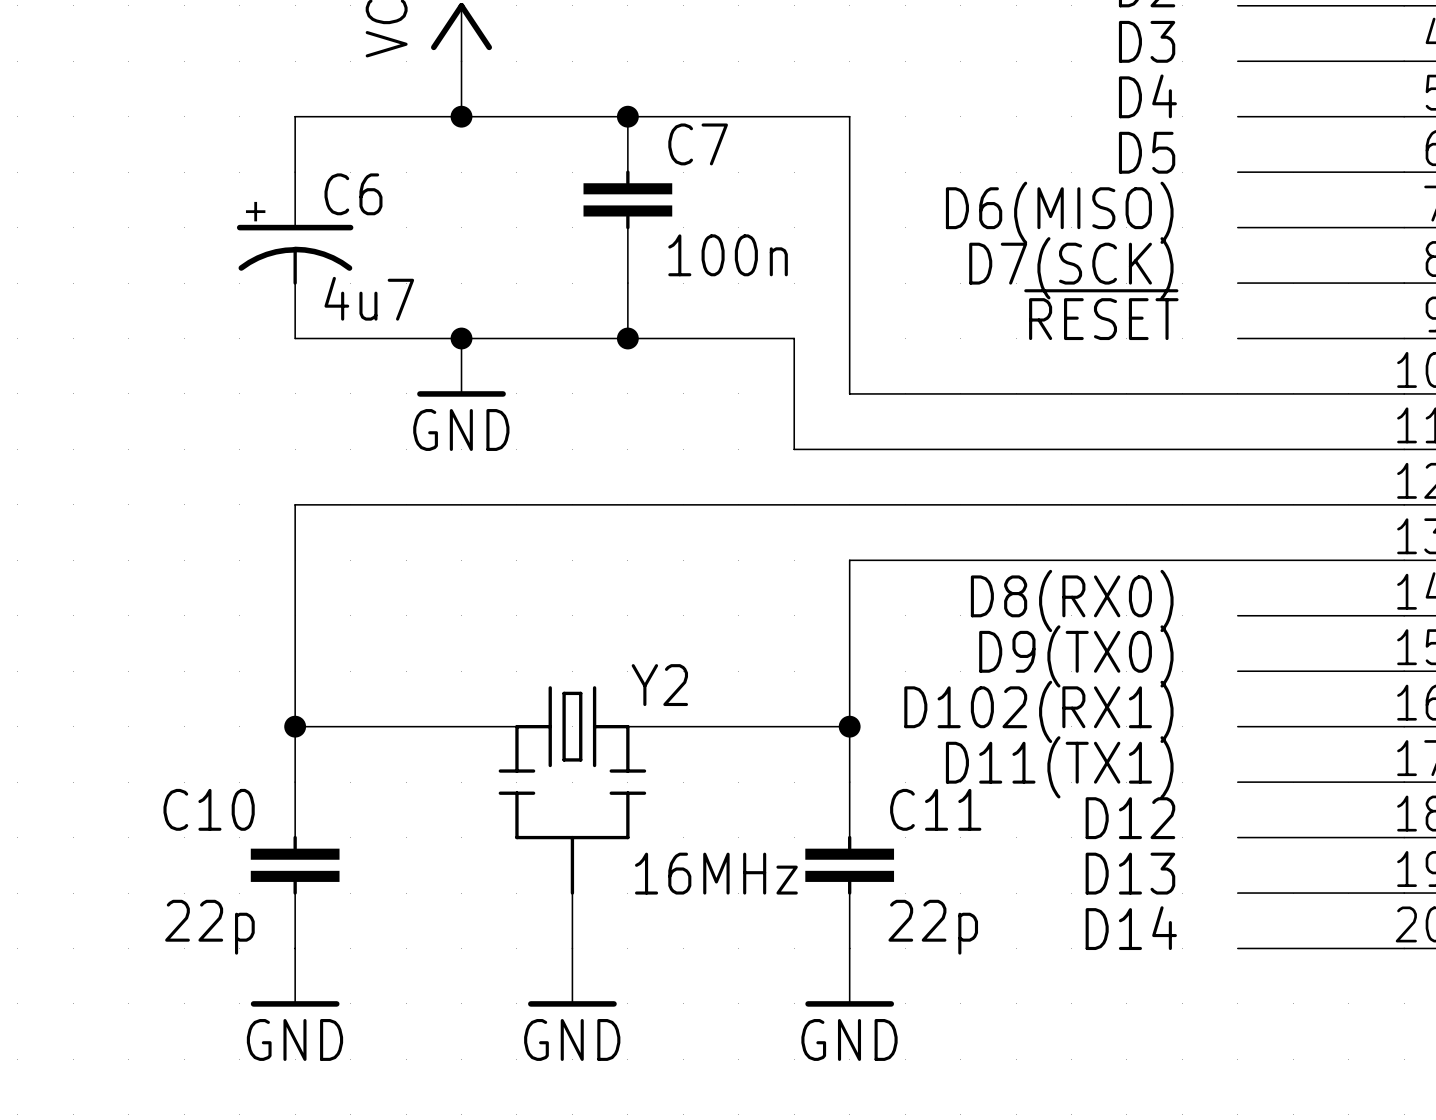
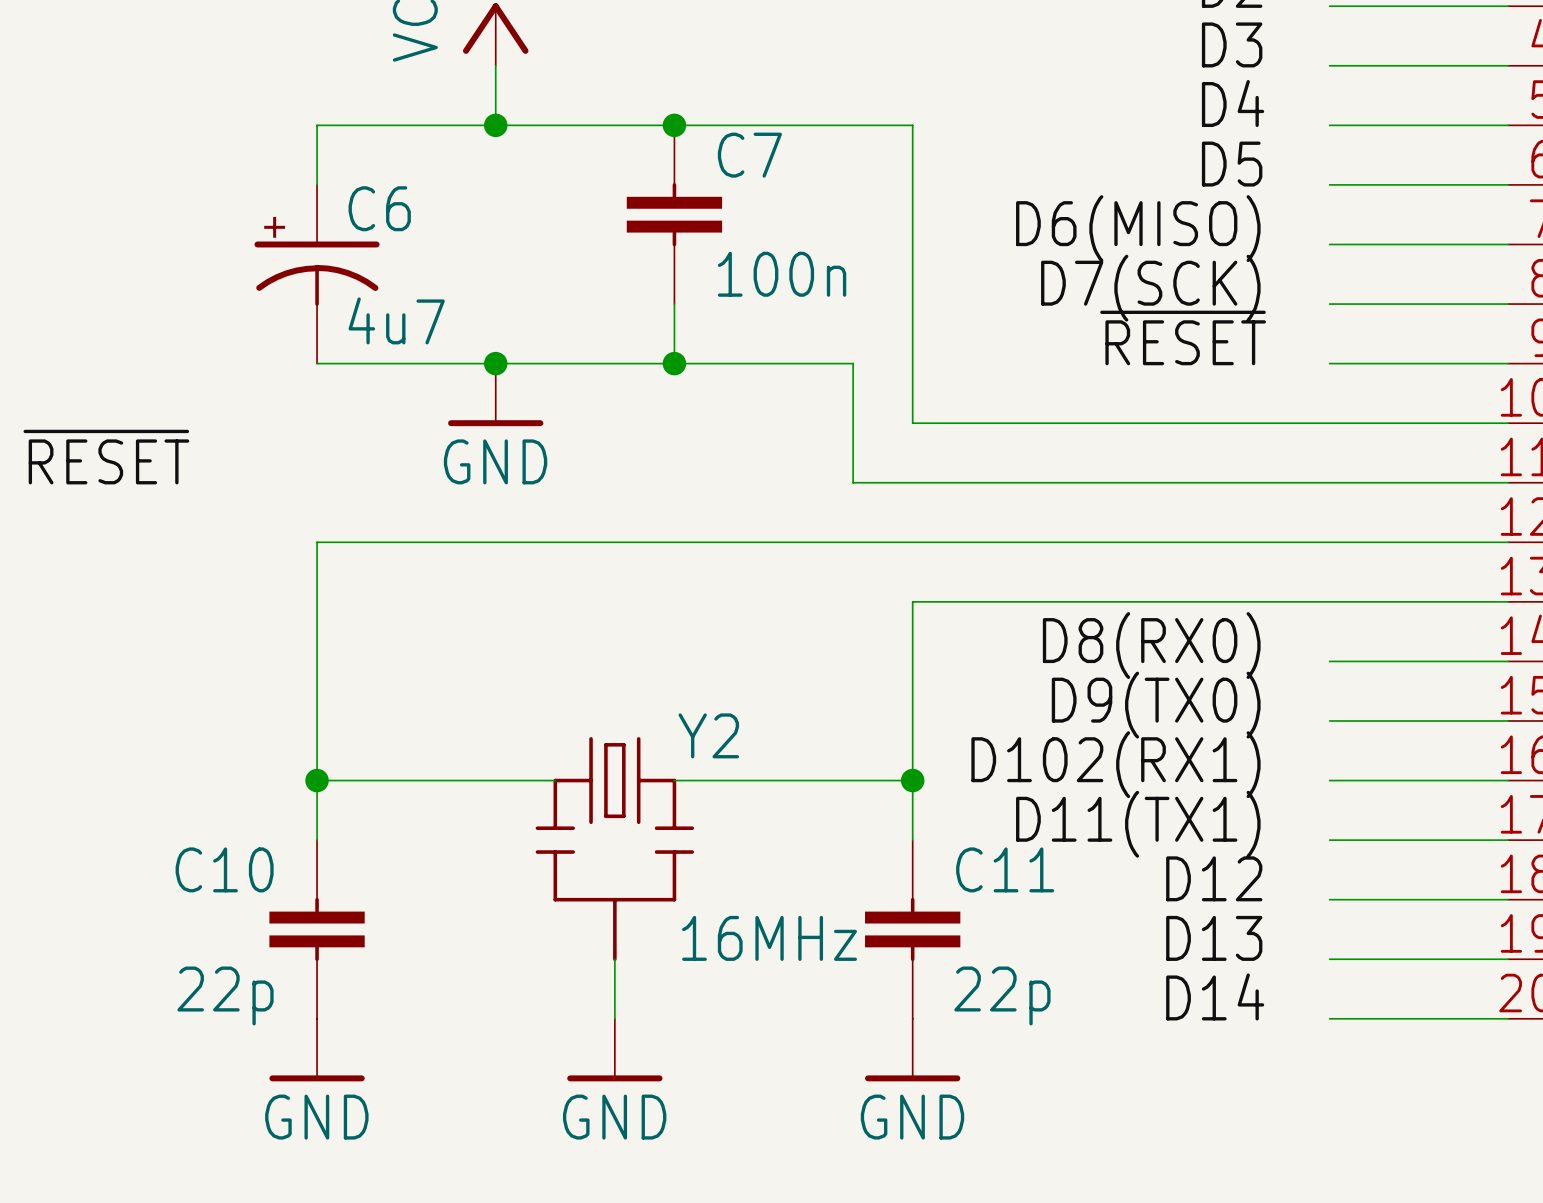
label: none -> ~{RESET} (106, 457)

